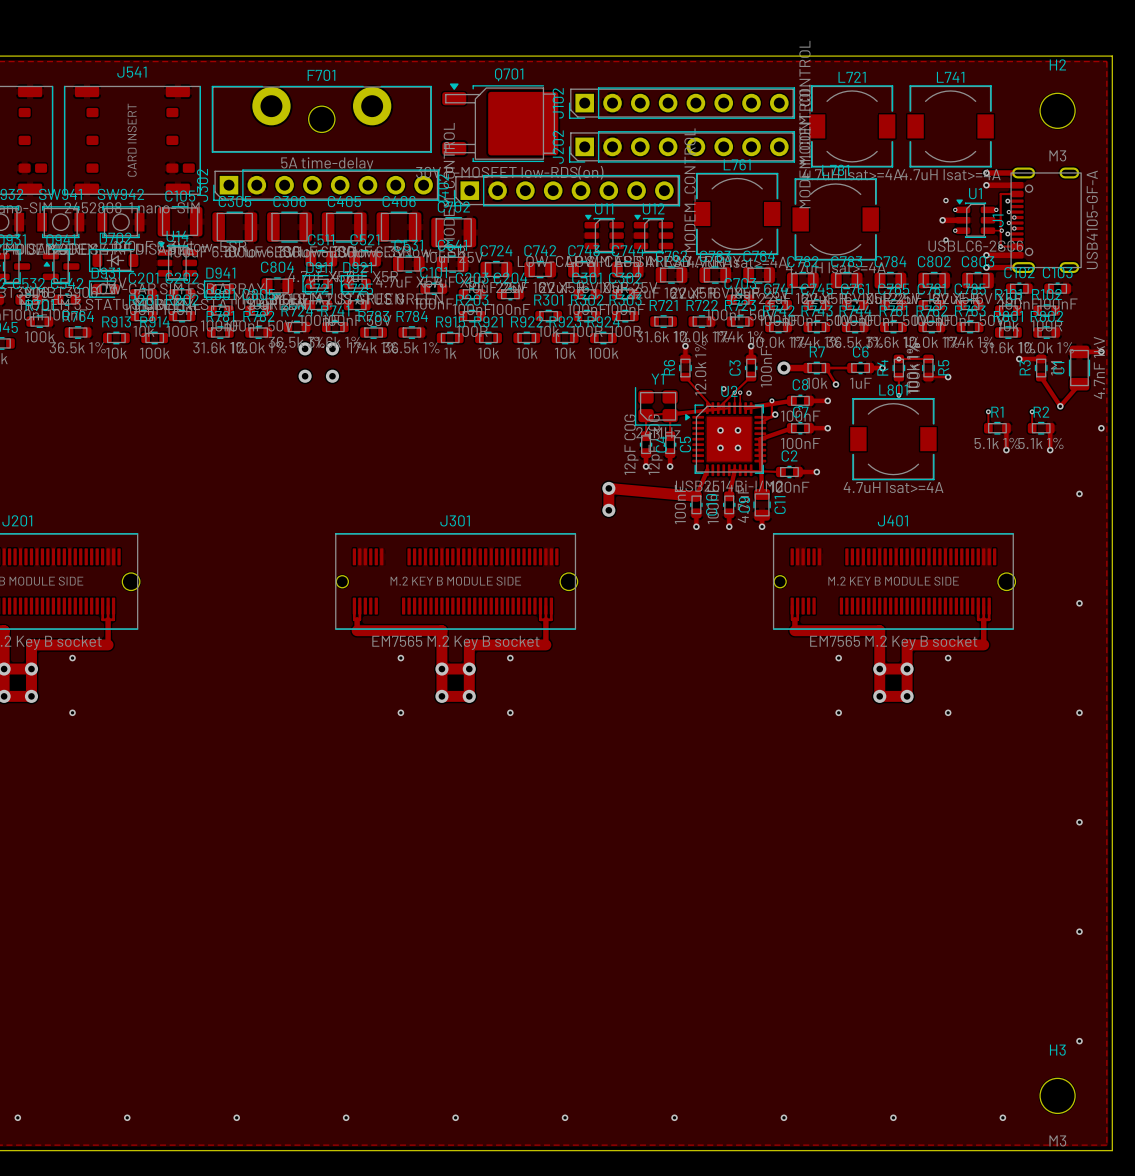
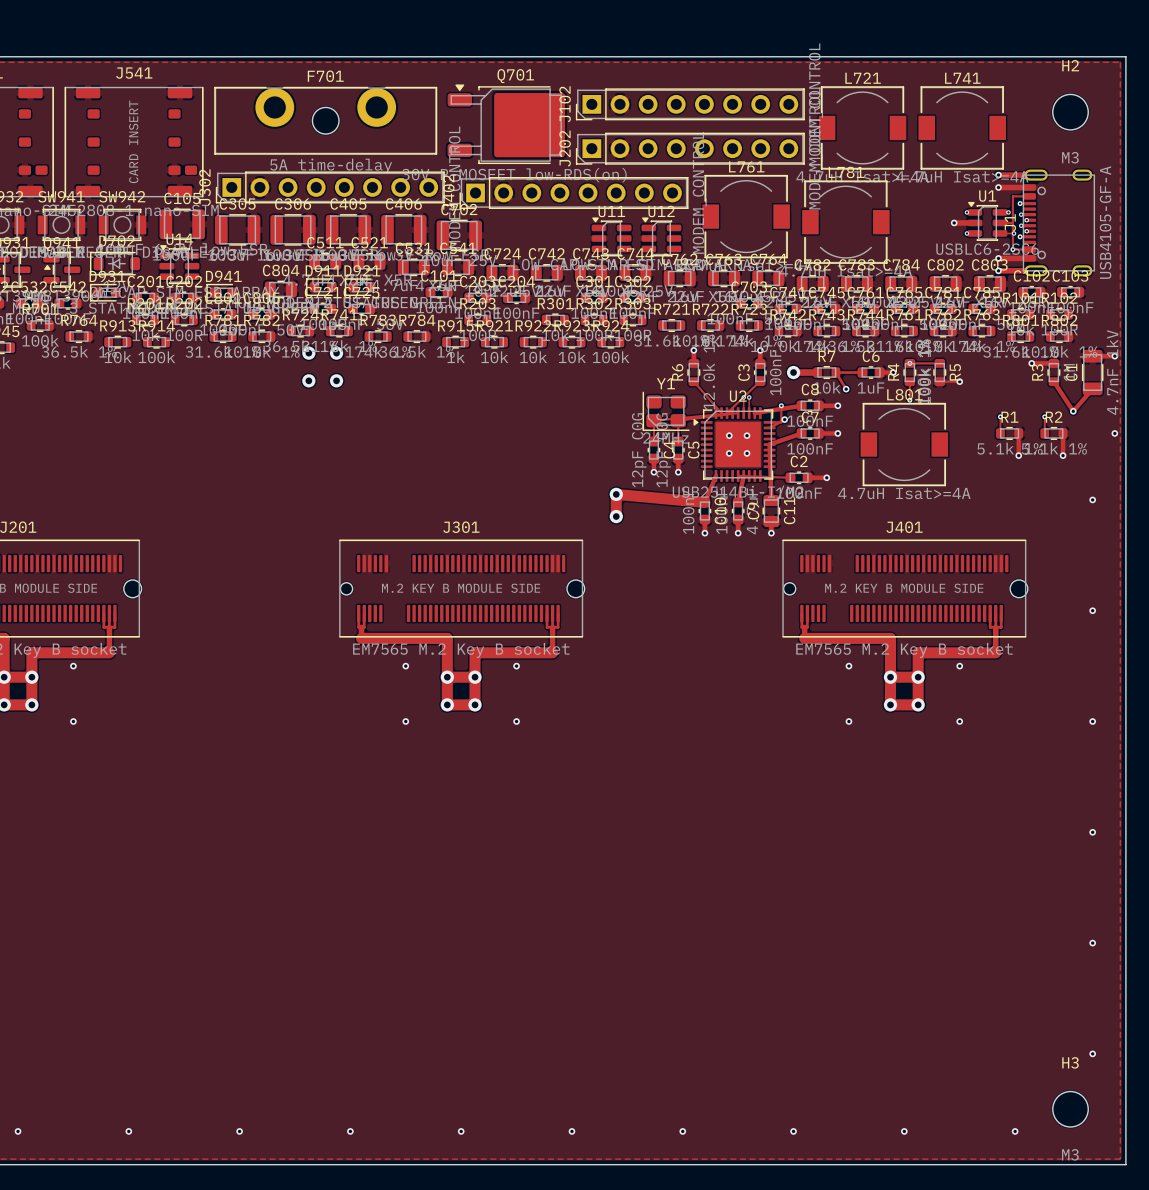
via: (945, 200) -> none
via: (945, 239) -> none
via: (723, 388) -> none
via: (748, 393) -> none

